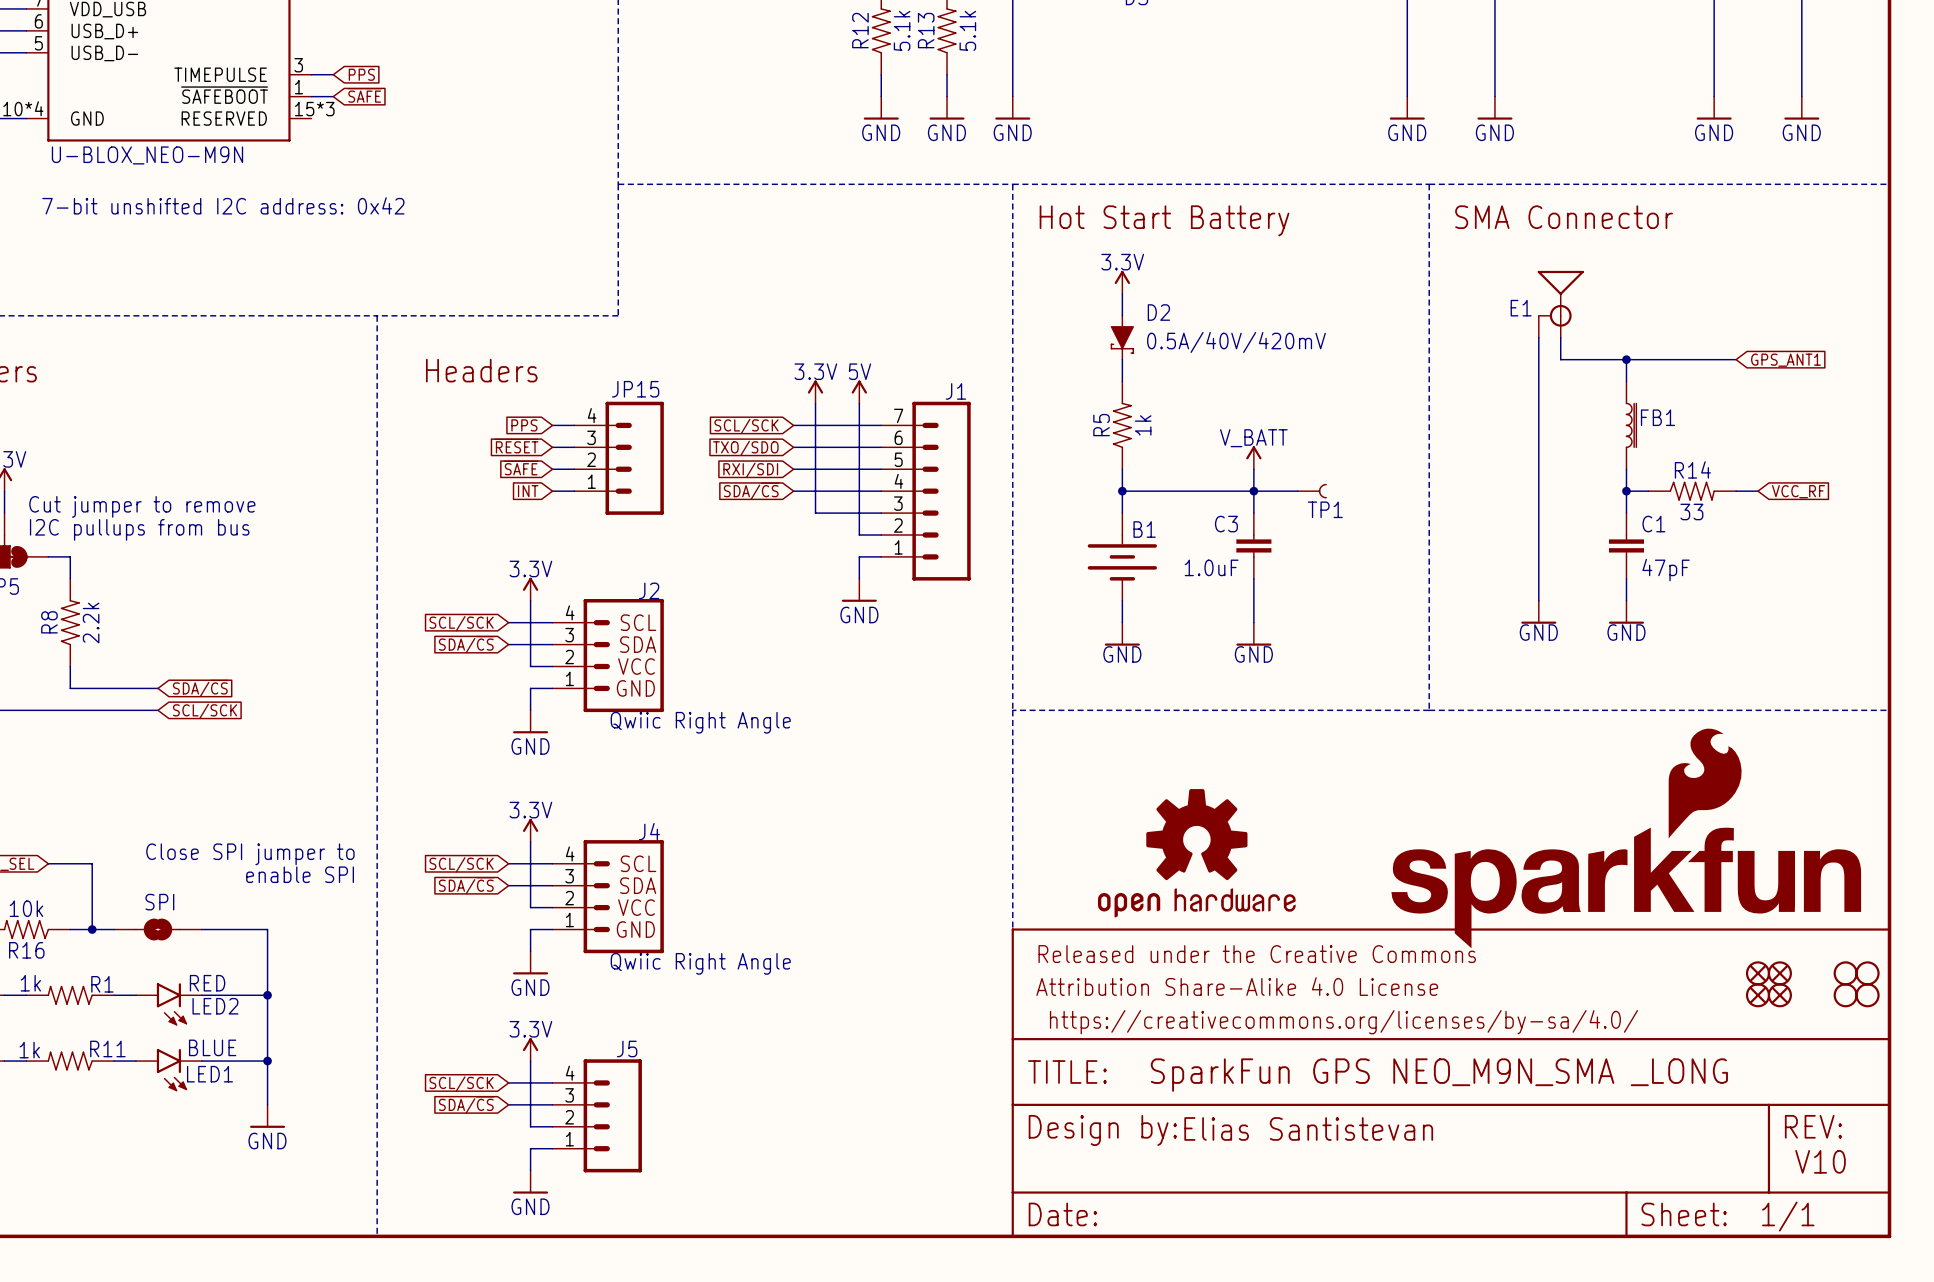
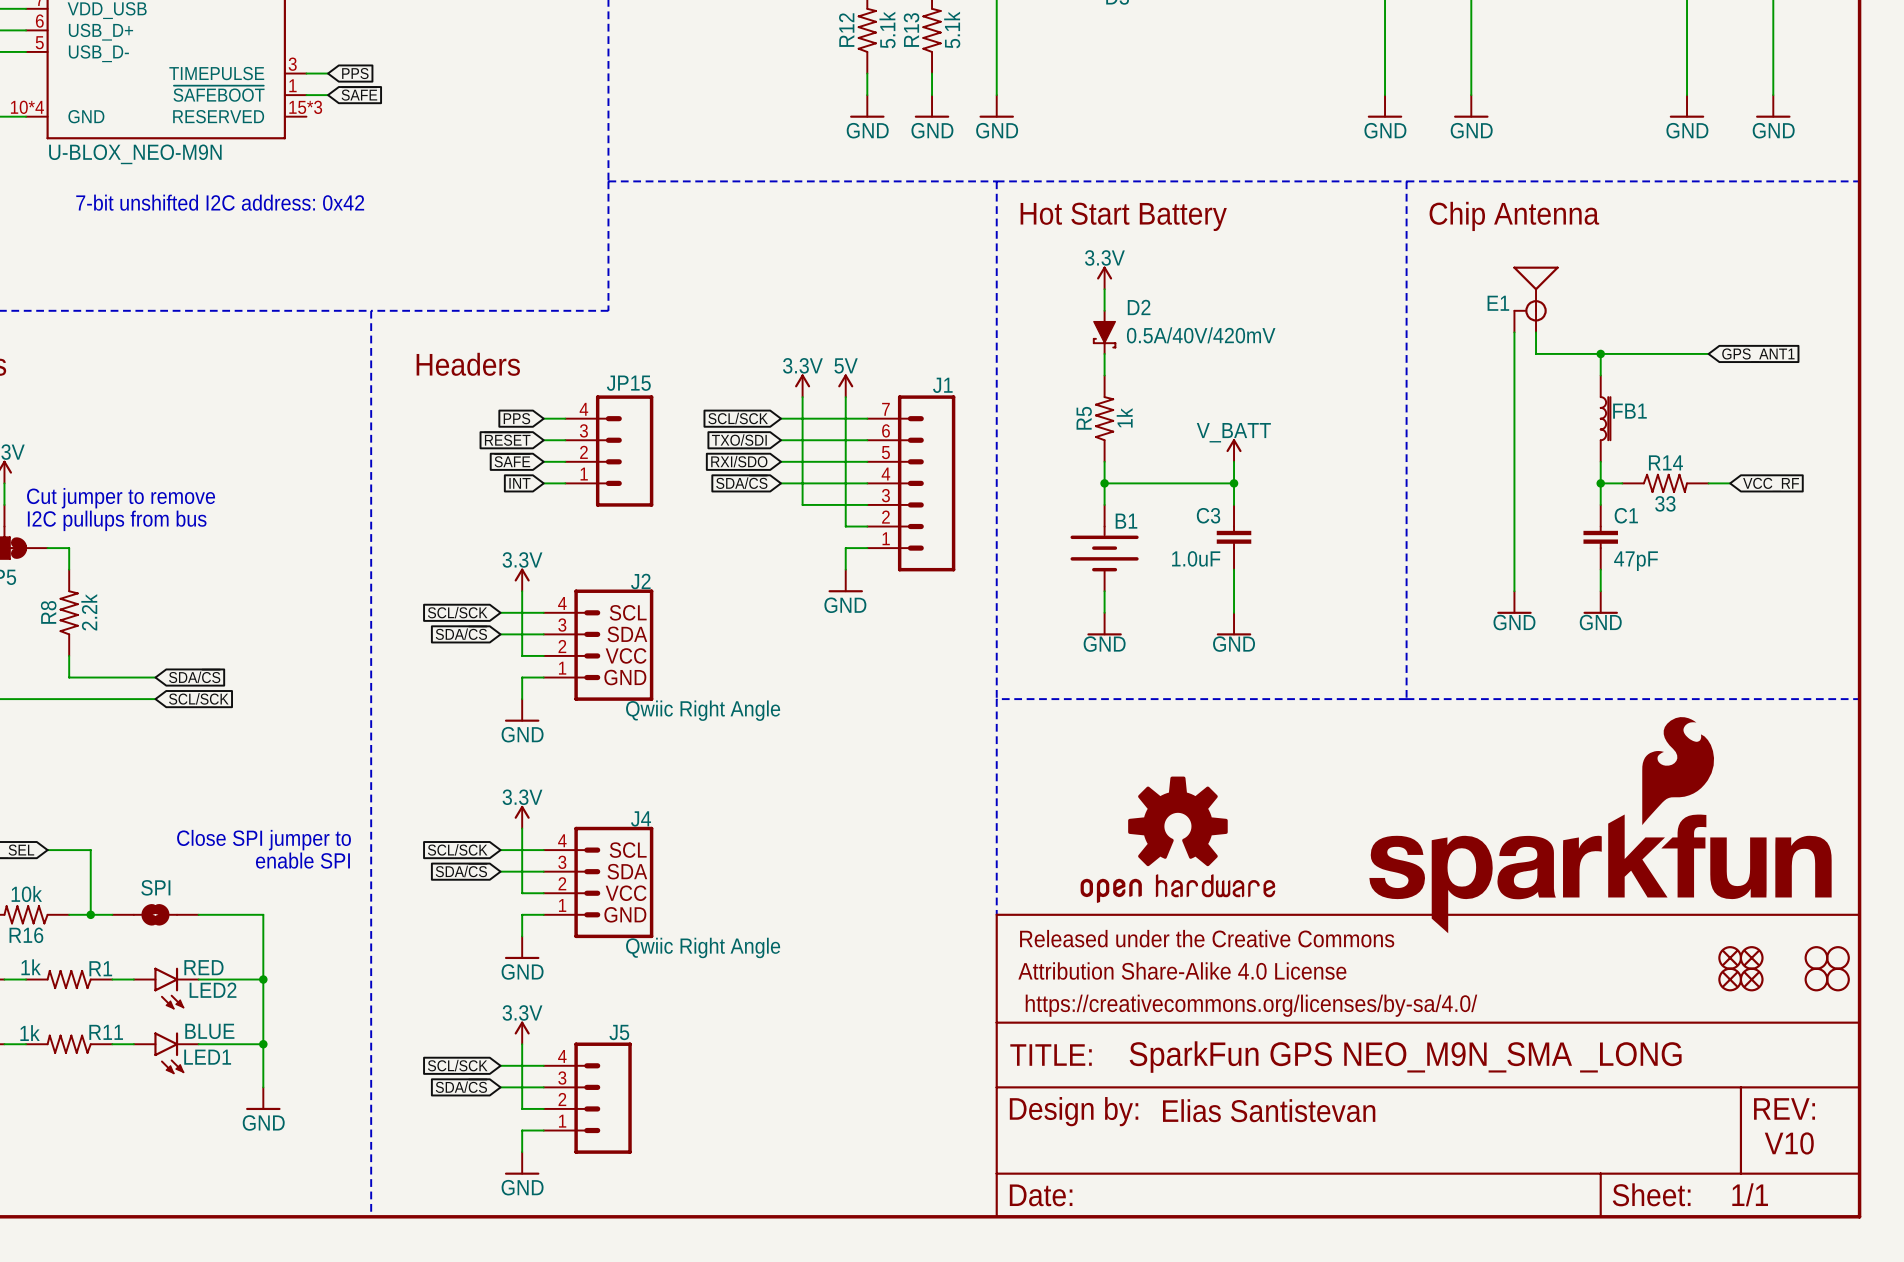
text: SMA Connector (1564, 217) -> Chip Antenna (1514, 216)
global label: TXO/SDO (745, 448) -> TXO/SDI (739, 440)
global label: RXI/SDI (750, 470) -> RXI/SDO (739, 461)
wire: (1253, 491) (1297, 491) -> none
TP1: (1311, 491) -> none

